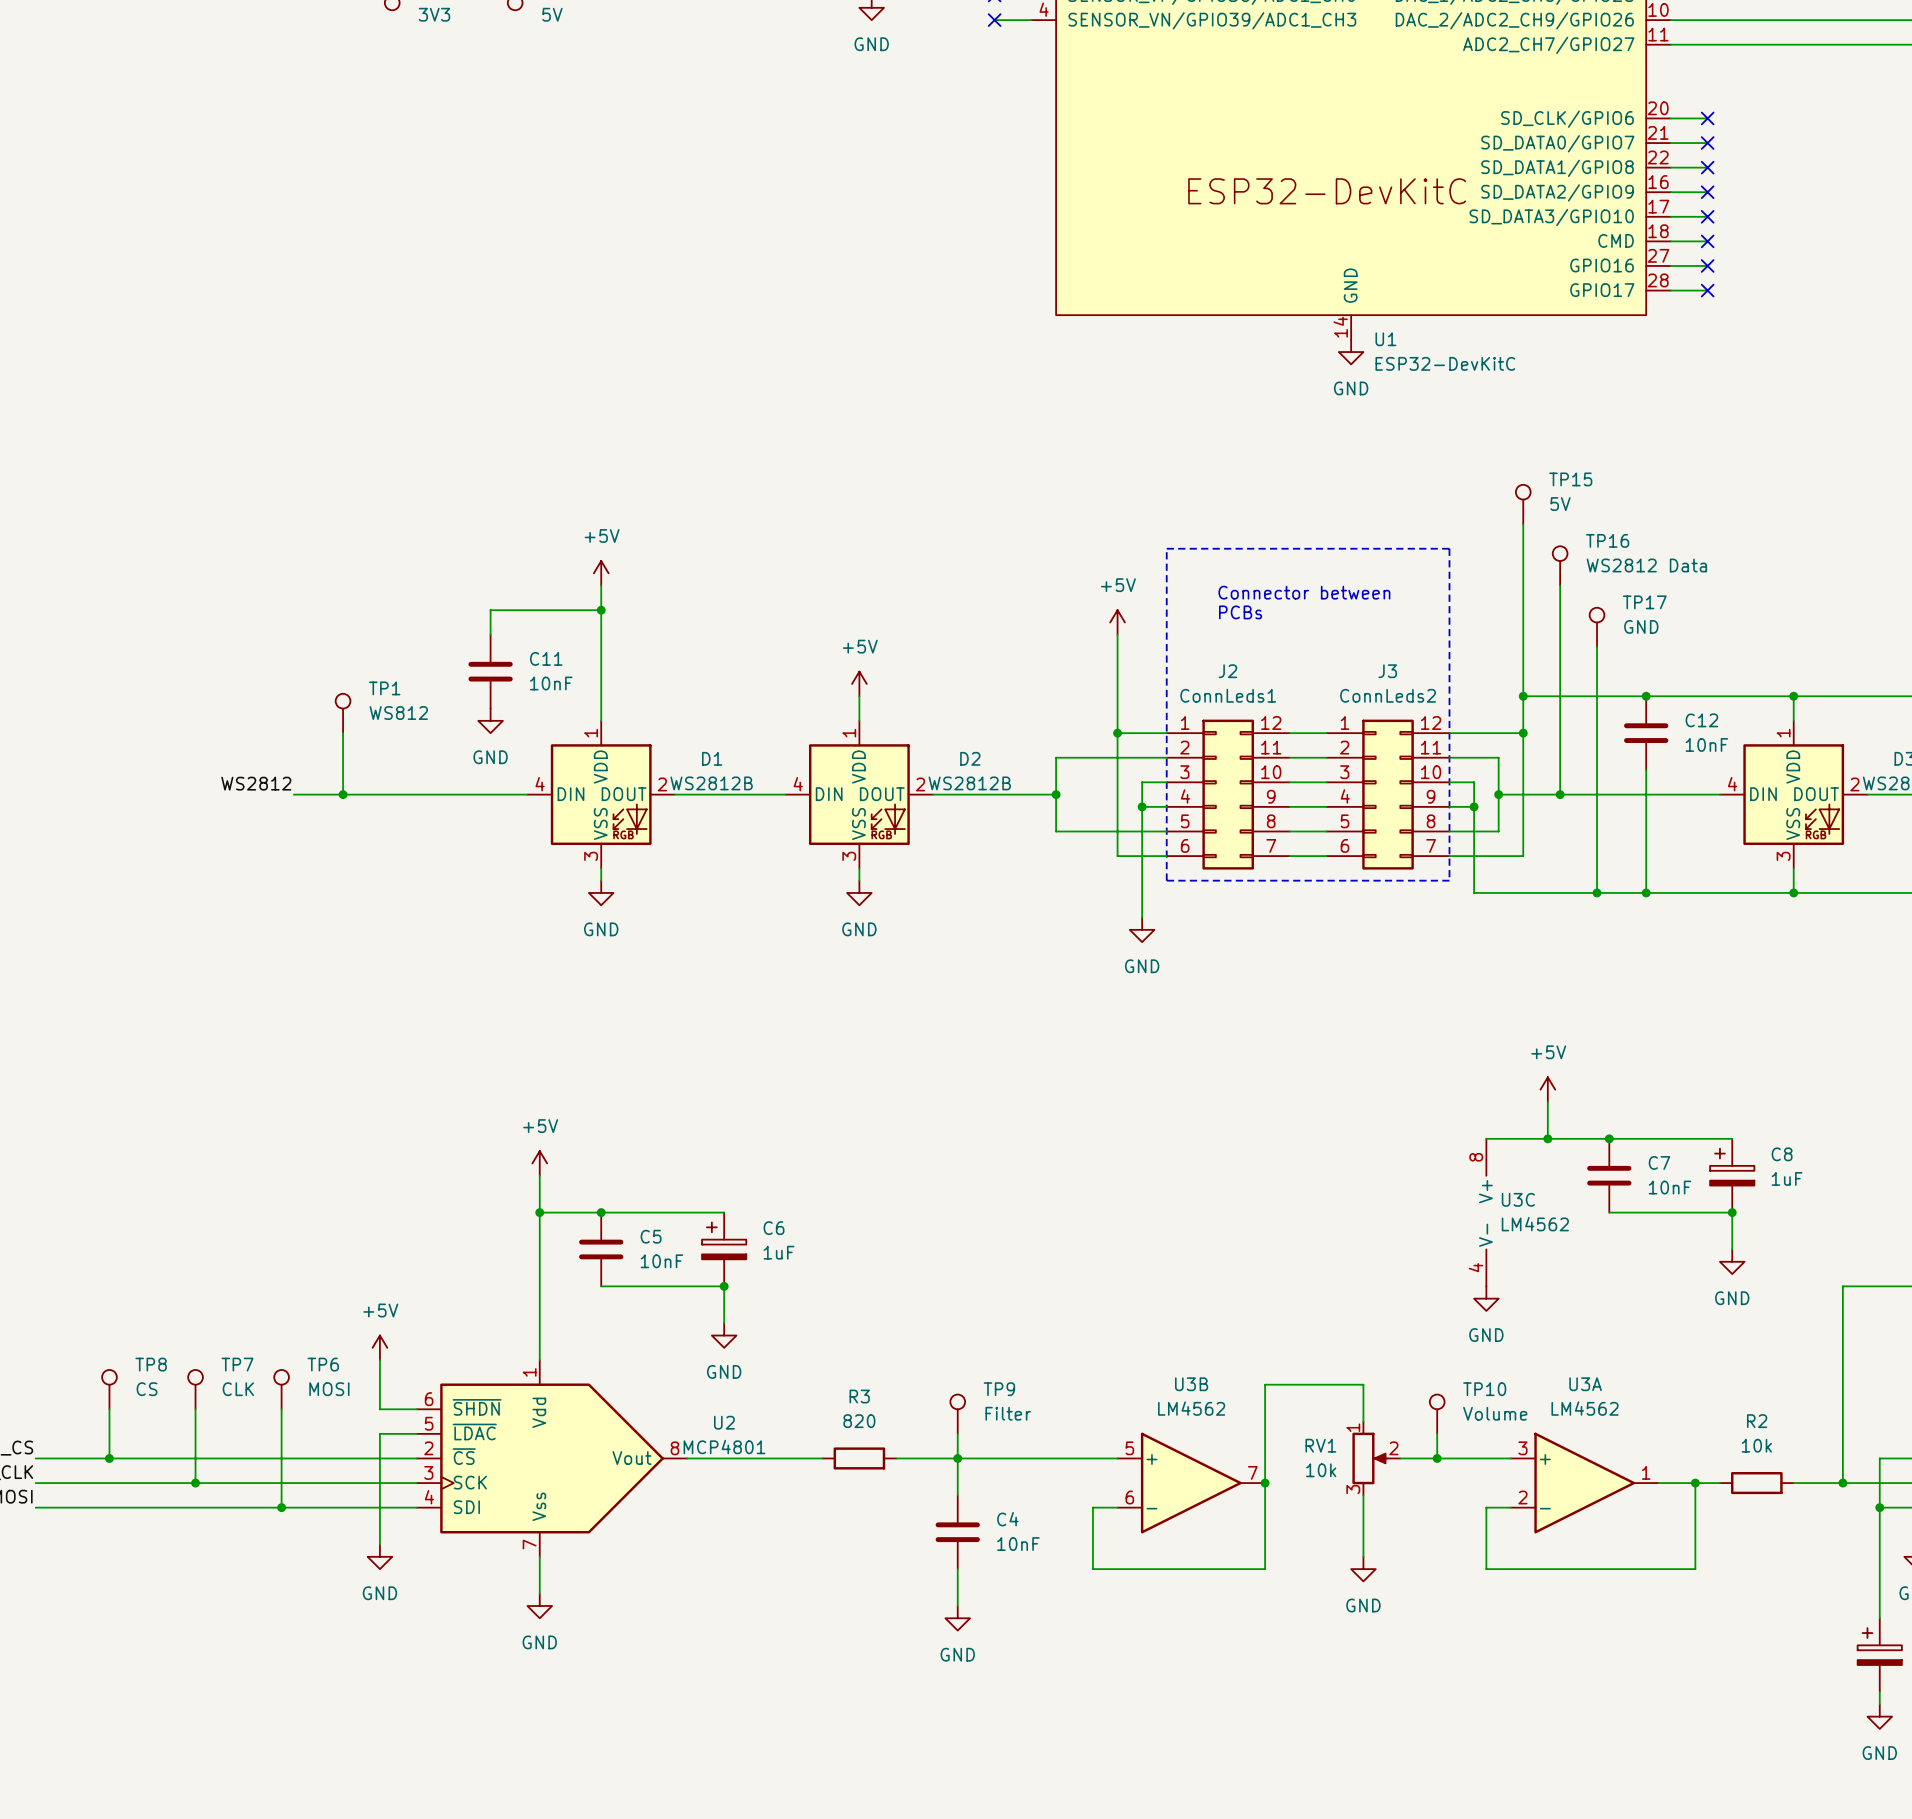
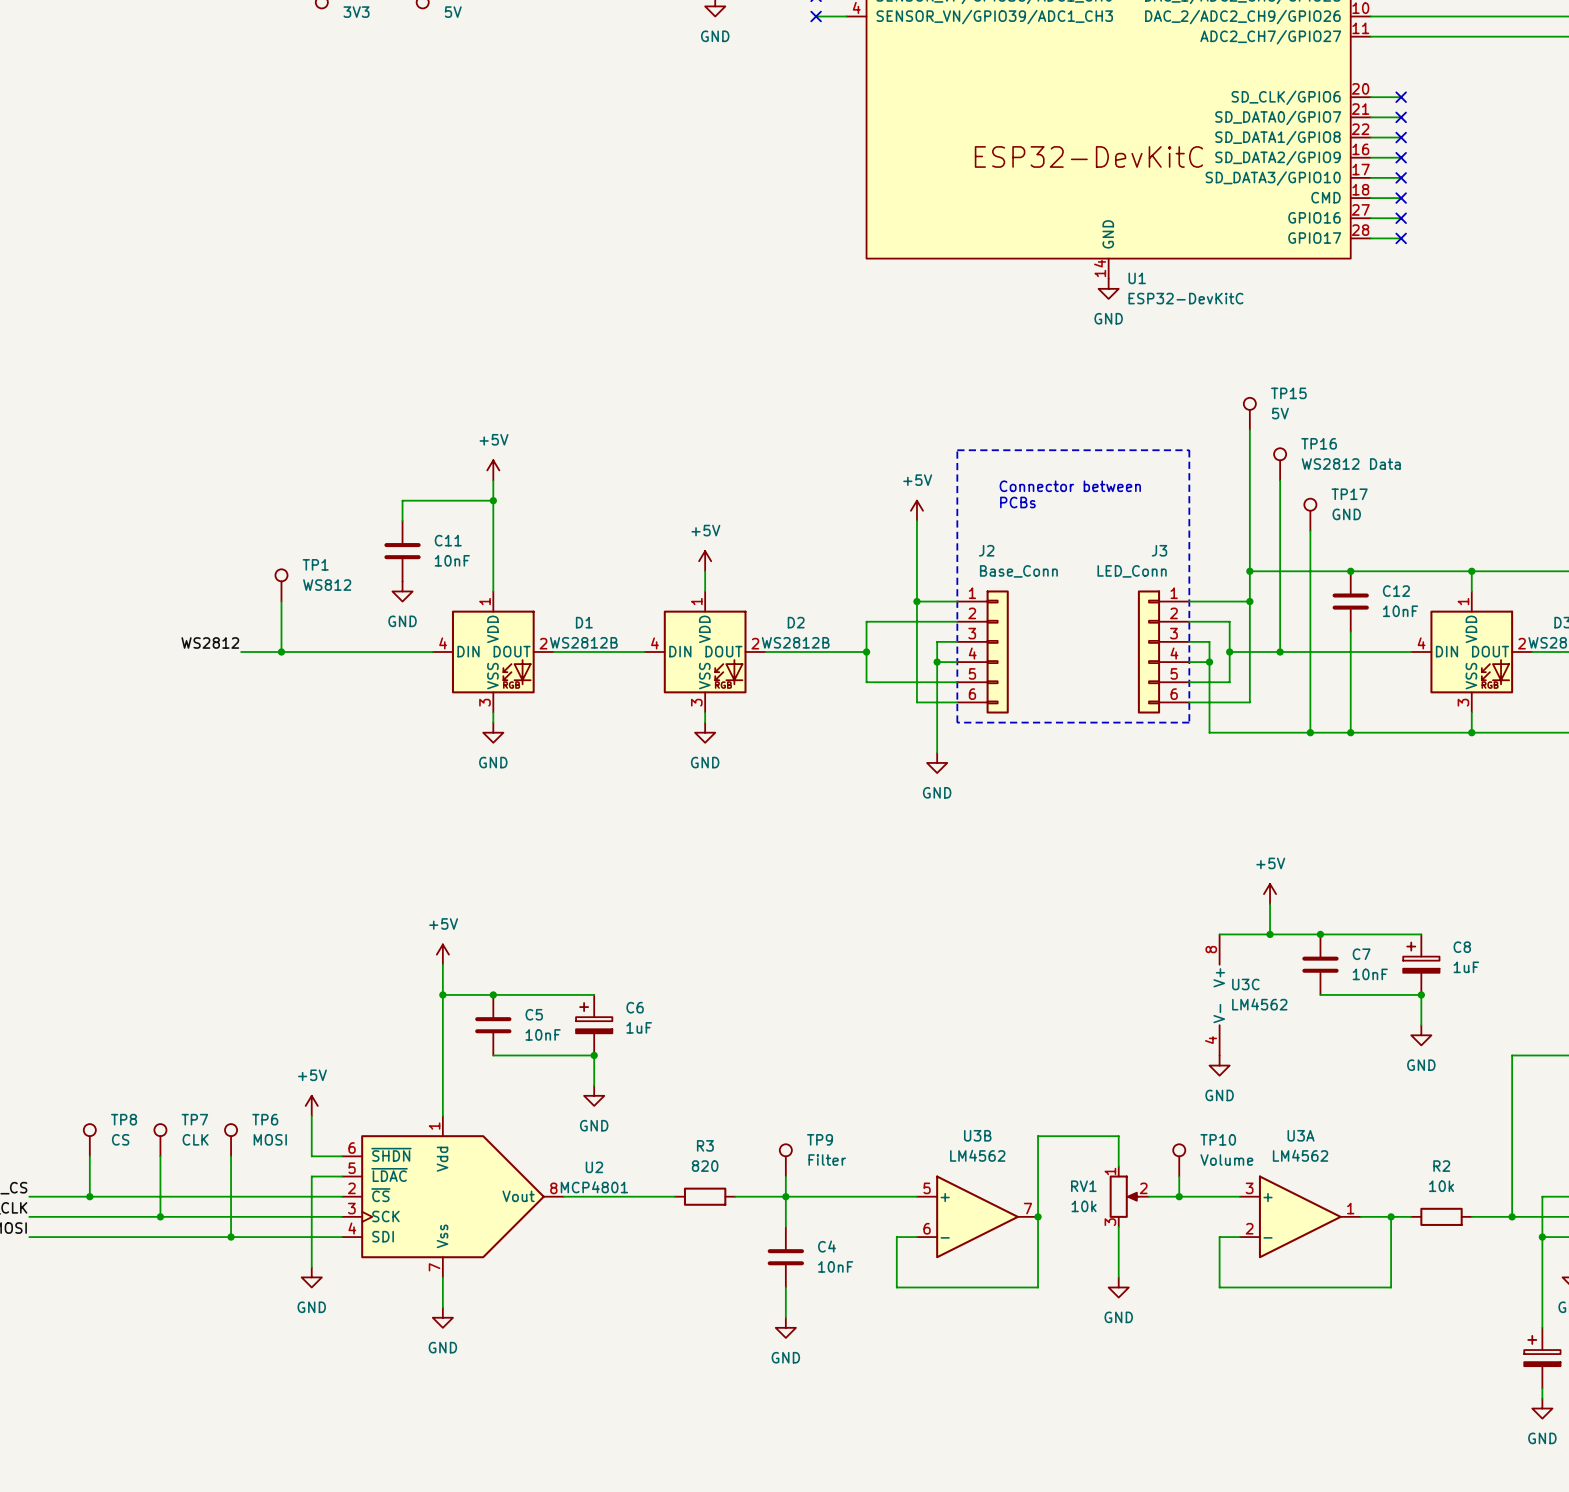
J2 value: ConnLeds1 (1228, 695) -> Base_Conn (1018, 571)
J3 value: ConnLeds2 (1388, 695) -> LED_Conn (1132, 571)
J2 symbol: [1166, 719, 1290, 870] -> [957, 590, 1009, 714]
J3 symbol: [1326, 719, 1450, 870] -> [1137, 590, 1190, 714]
wire: (1289, 733) (1326, 733) -> none
wire: (1289, 757) (1326, 757) -> none
wire: (1289, 782) (1326, 782) -> none
wire: (1289, 806) (1326, 806) -> none
wire: (1289, 831) (1326, 831) -> none
wire: (1289, 856) (1326, 856) -> none

